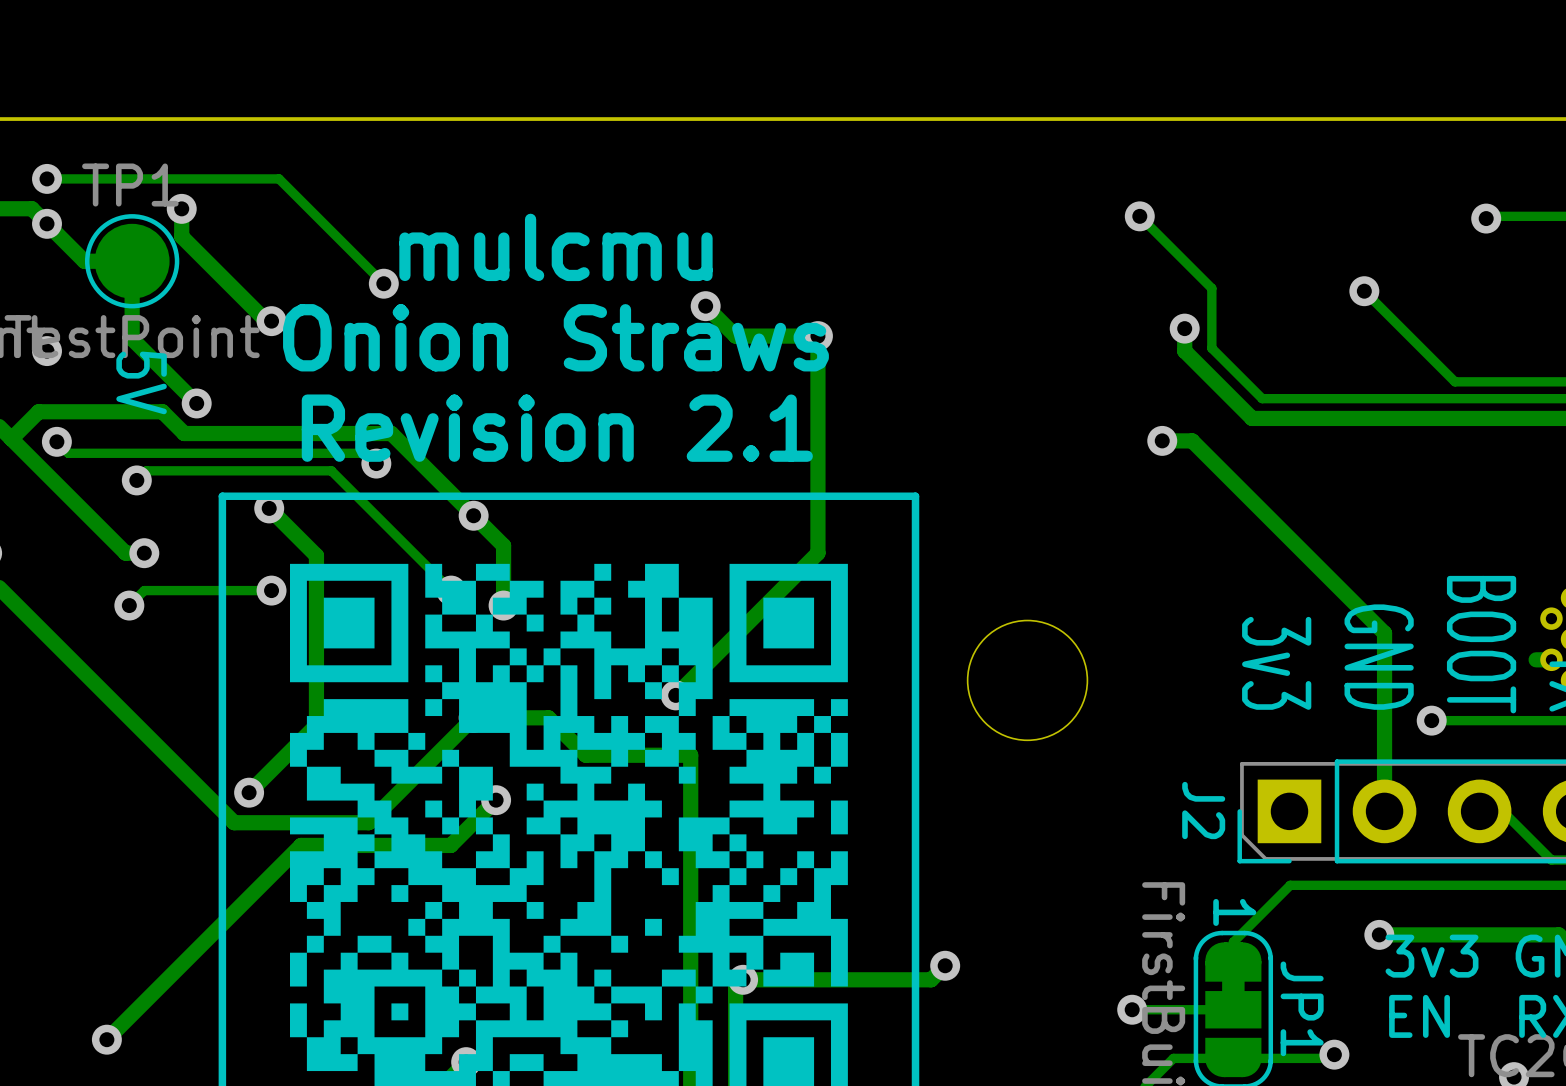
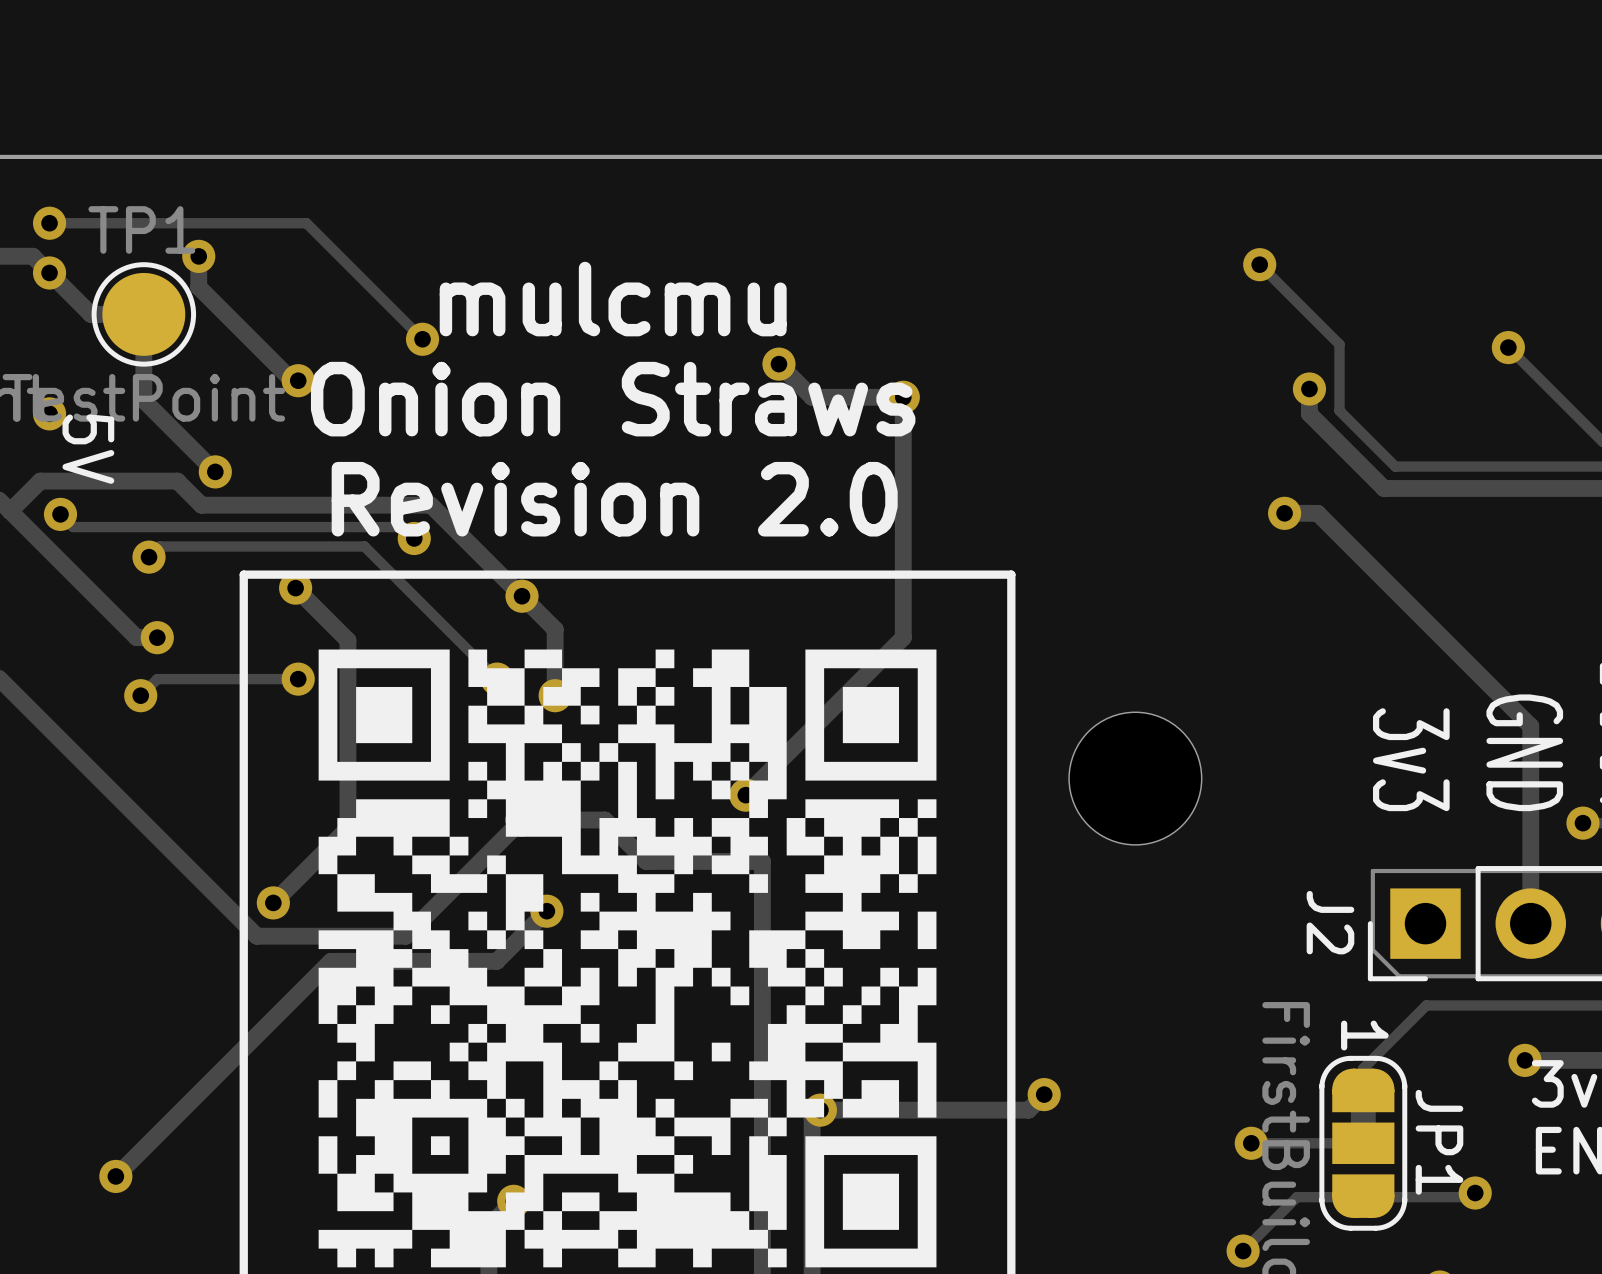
text position: 5V (141, 382) -> 5V (88, 449)
text: Revision 2.1 (557, 428) -> Revision 2.0 (614, 499)

